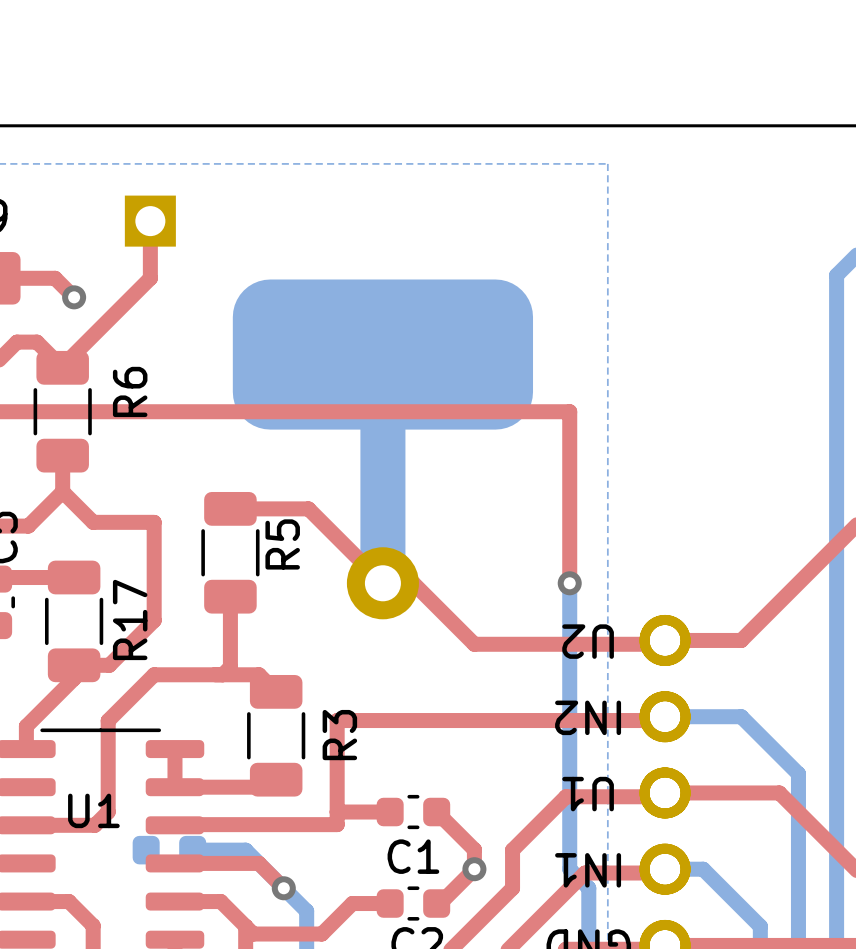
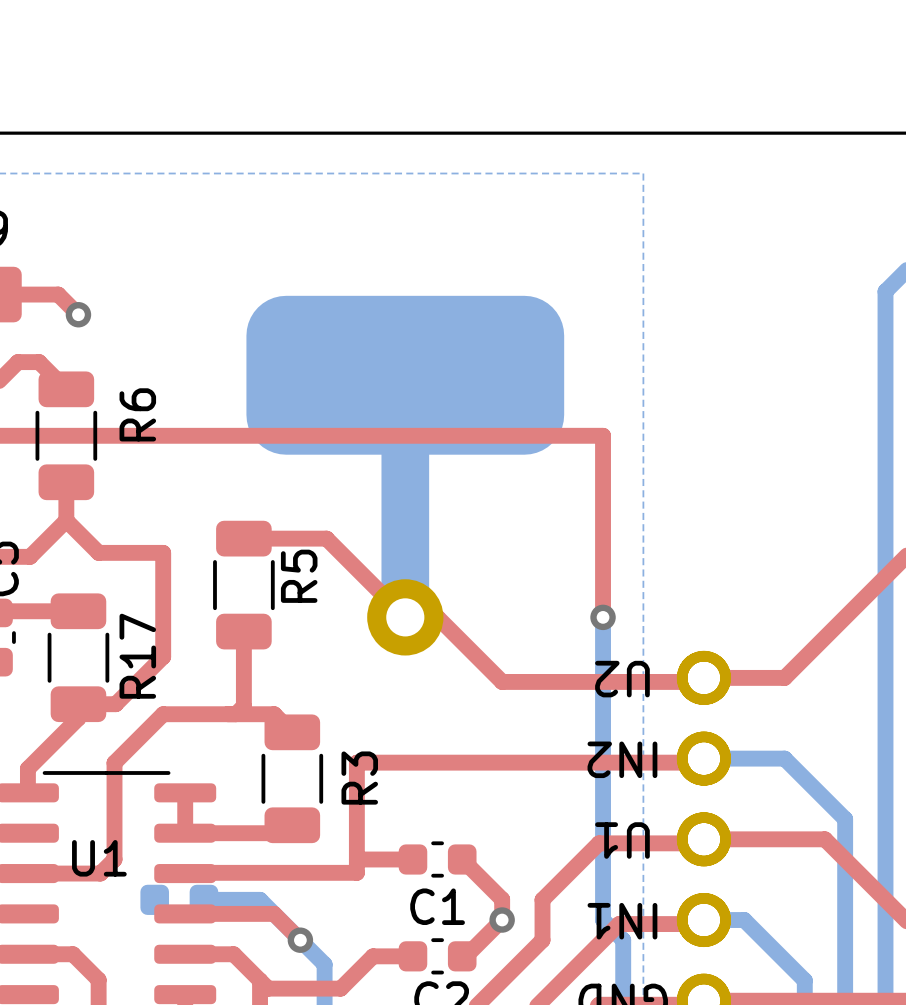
top track: (150, 221) (150, 278) (62, 367) -> none
part: (150, 221) -> none

